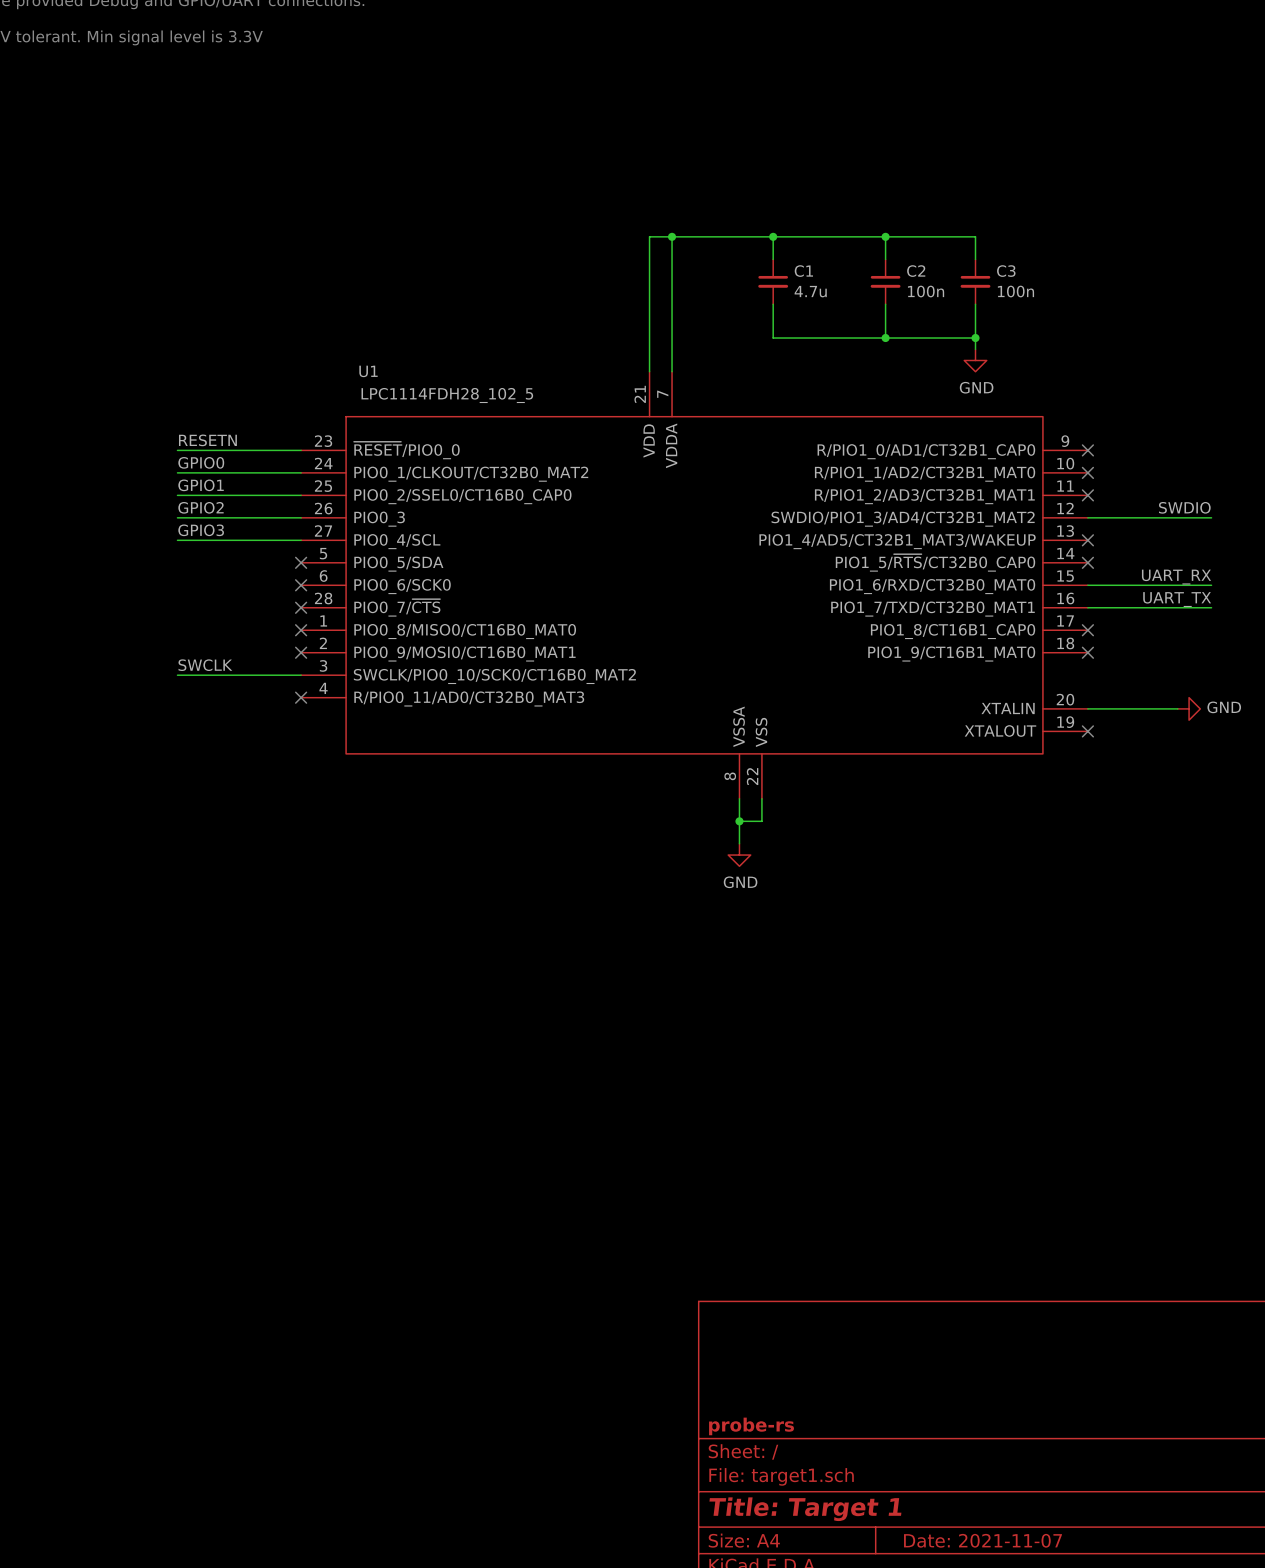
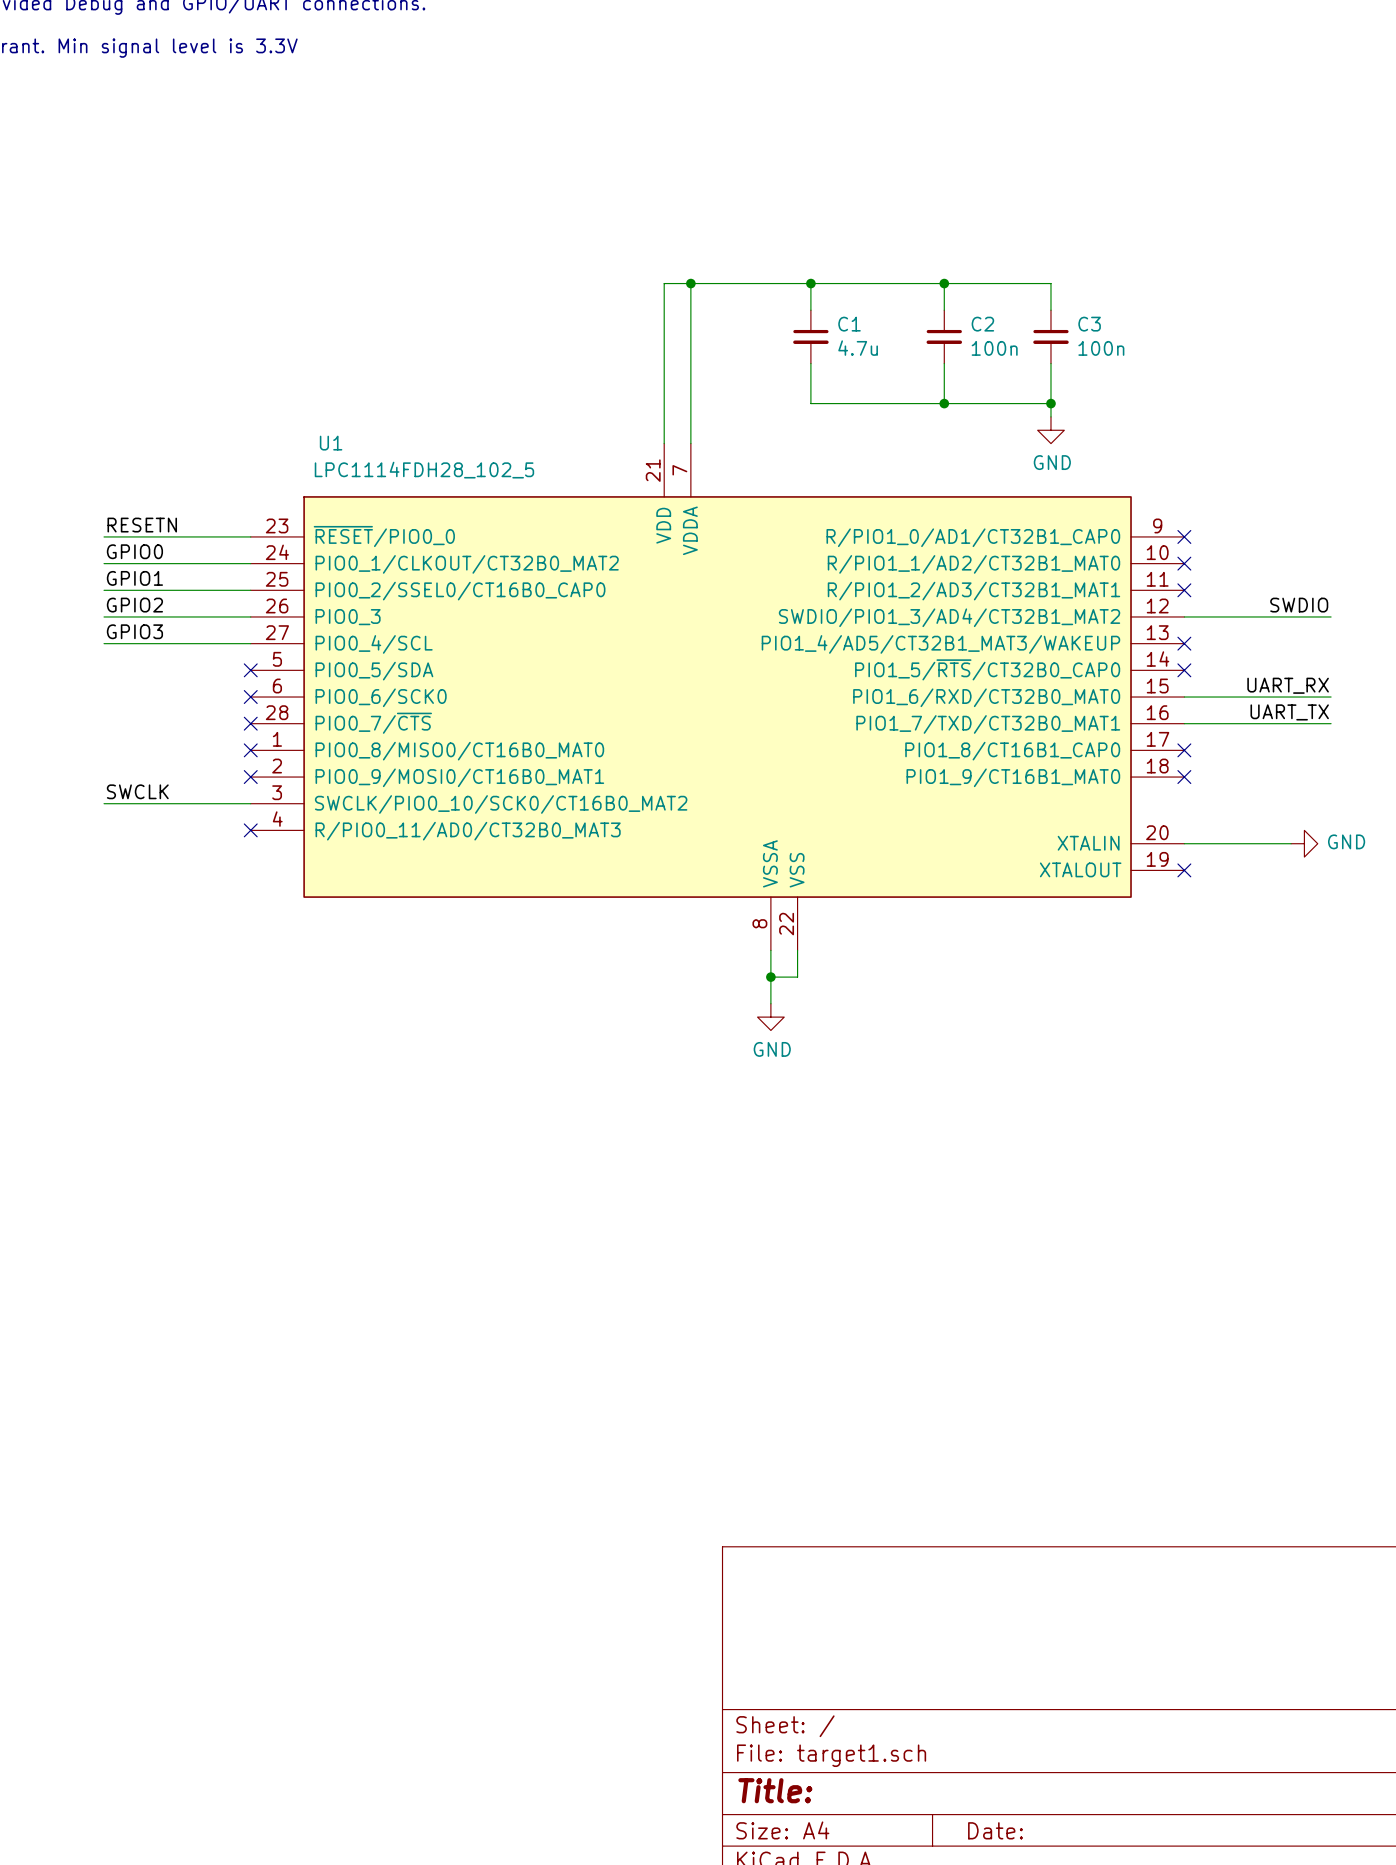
title block: probe-rs (751, 1426) -> none
title block: Title: Target 1 (805, 1509) -> Title: (775, 1790)
title block: Date: 2021-11-07 (982, 1540) -> Date: (995, 1830)

